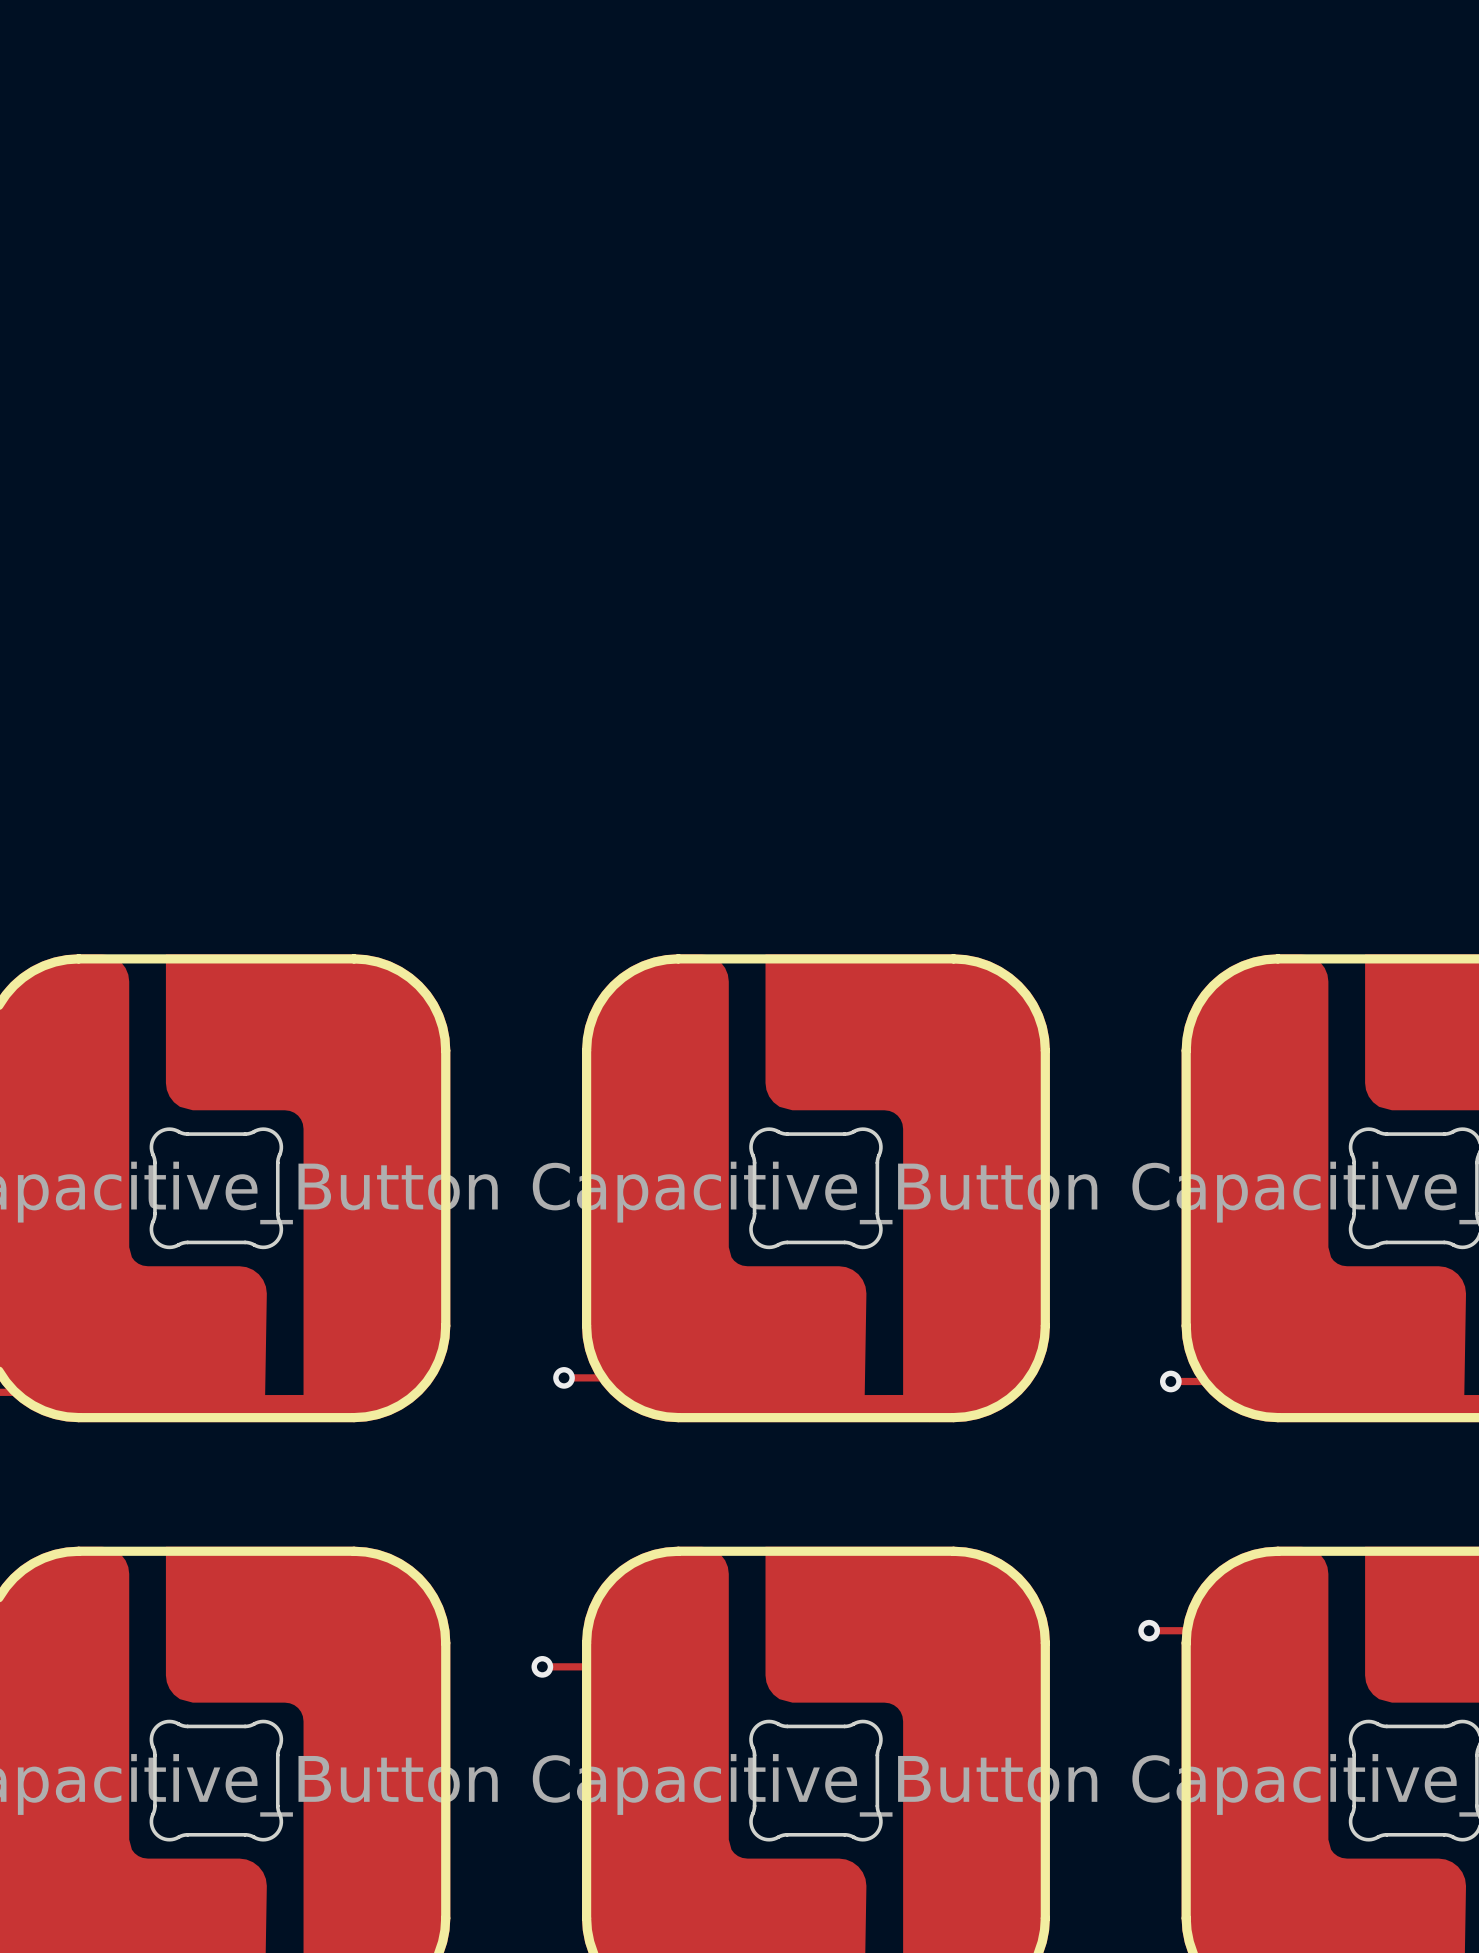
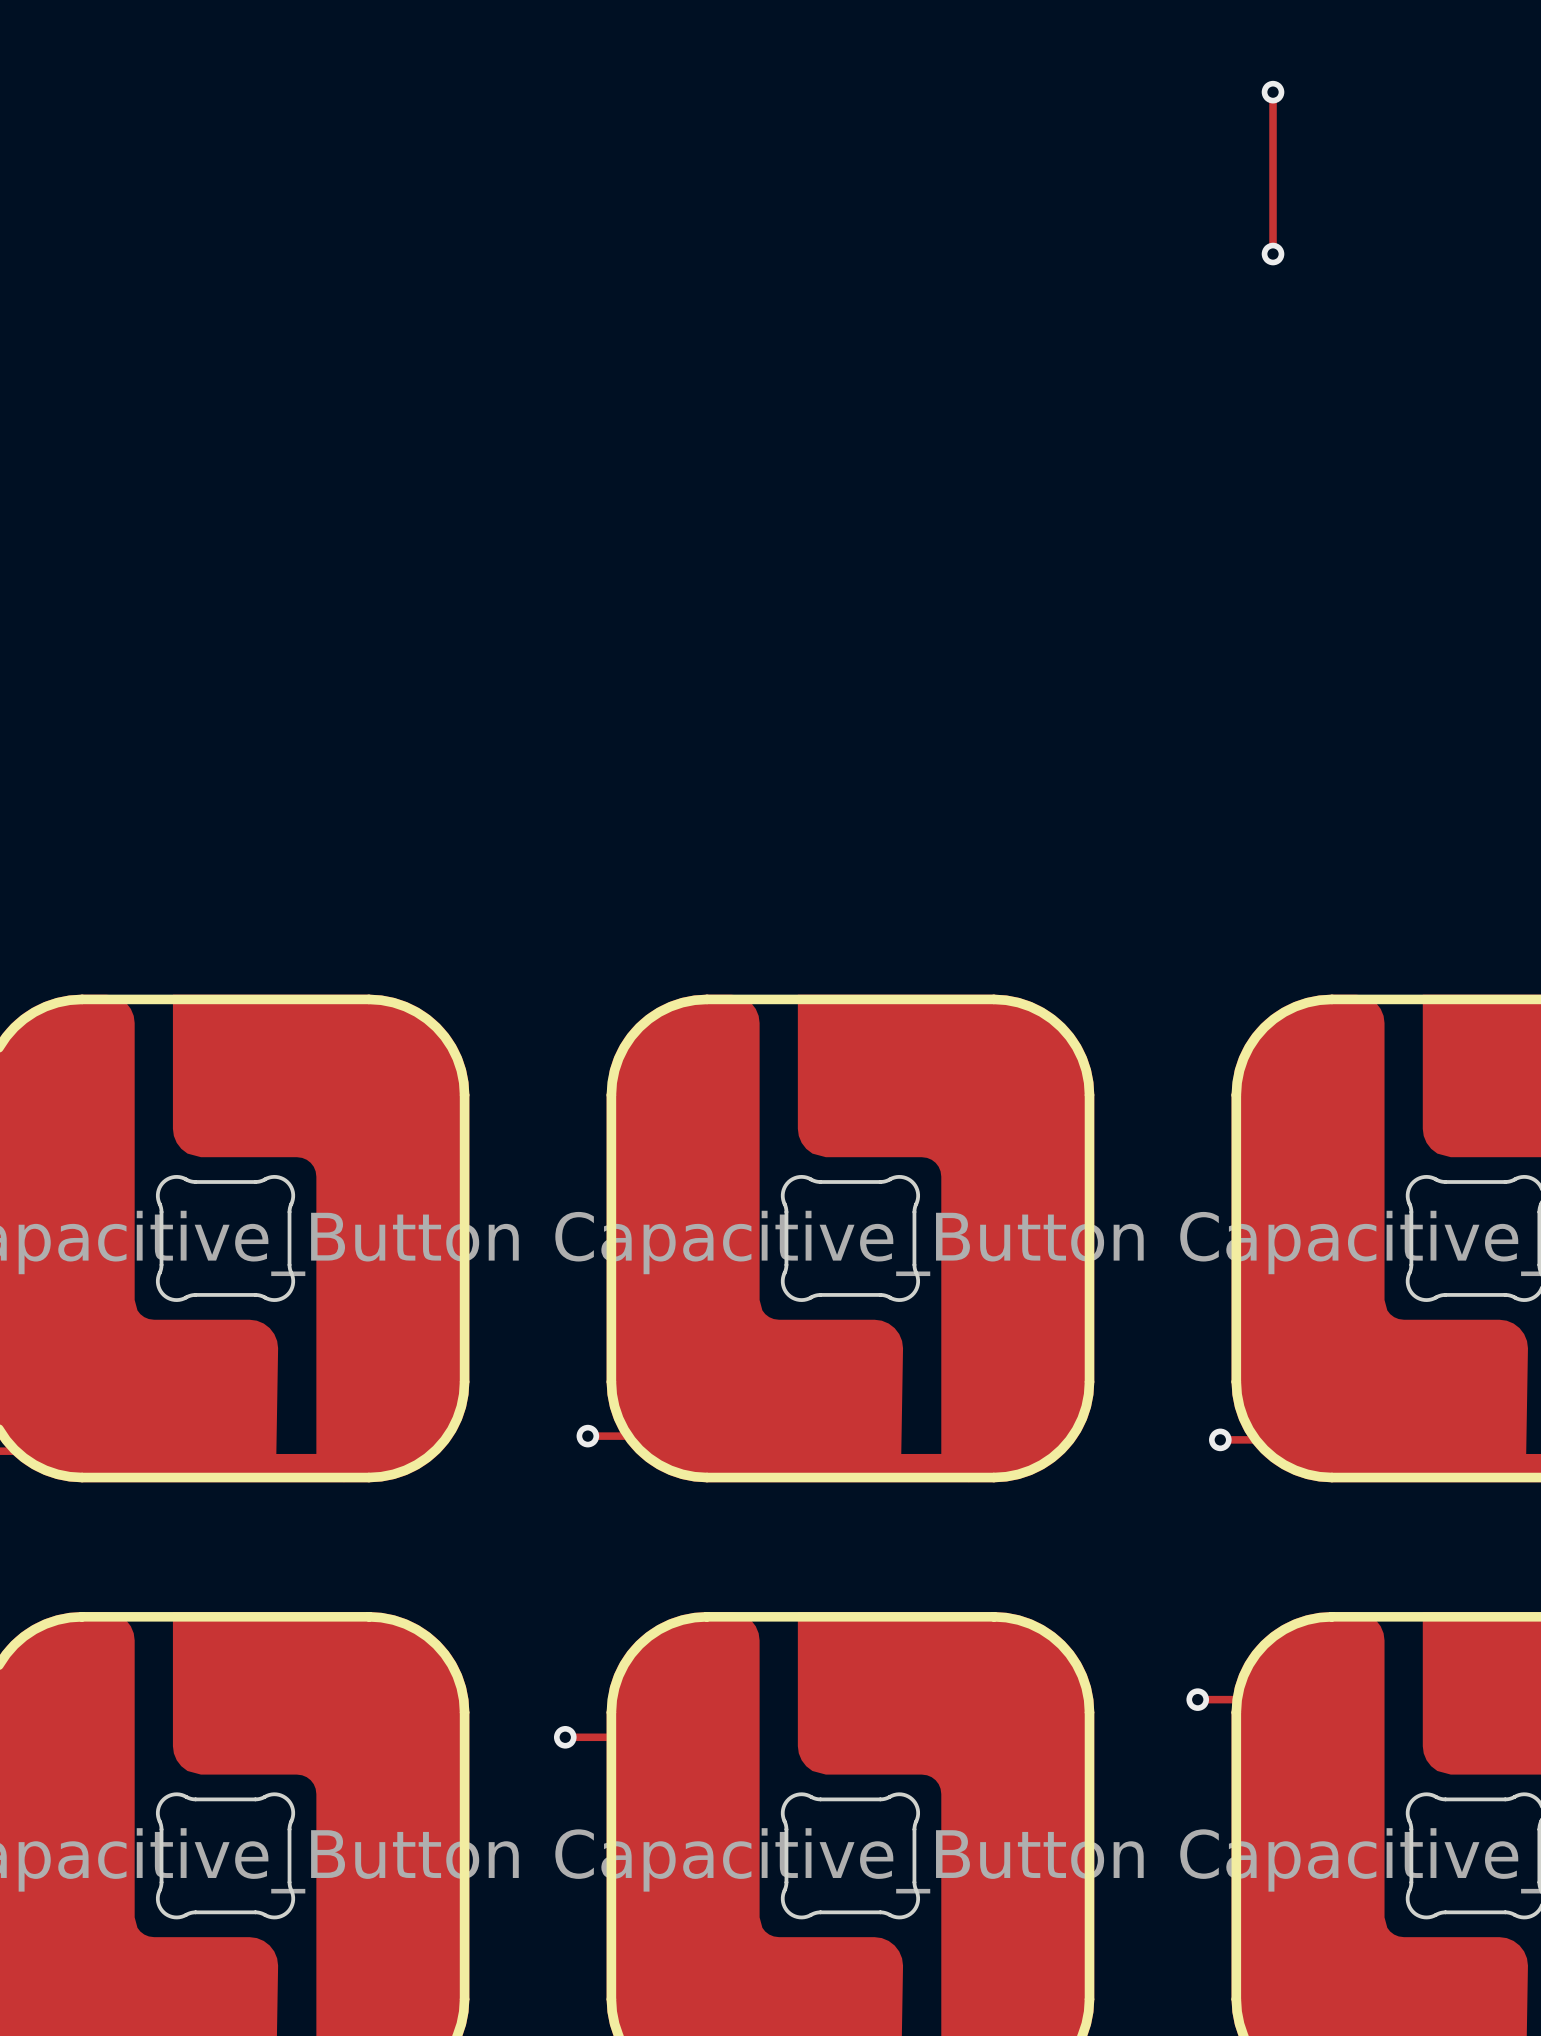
track: none -> (1273, 92) (1273, 254)
via: none -> (1273, 92)
via: none -> (1273, 254)

